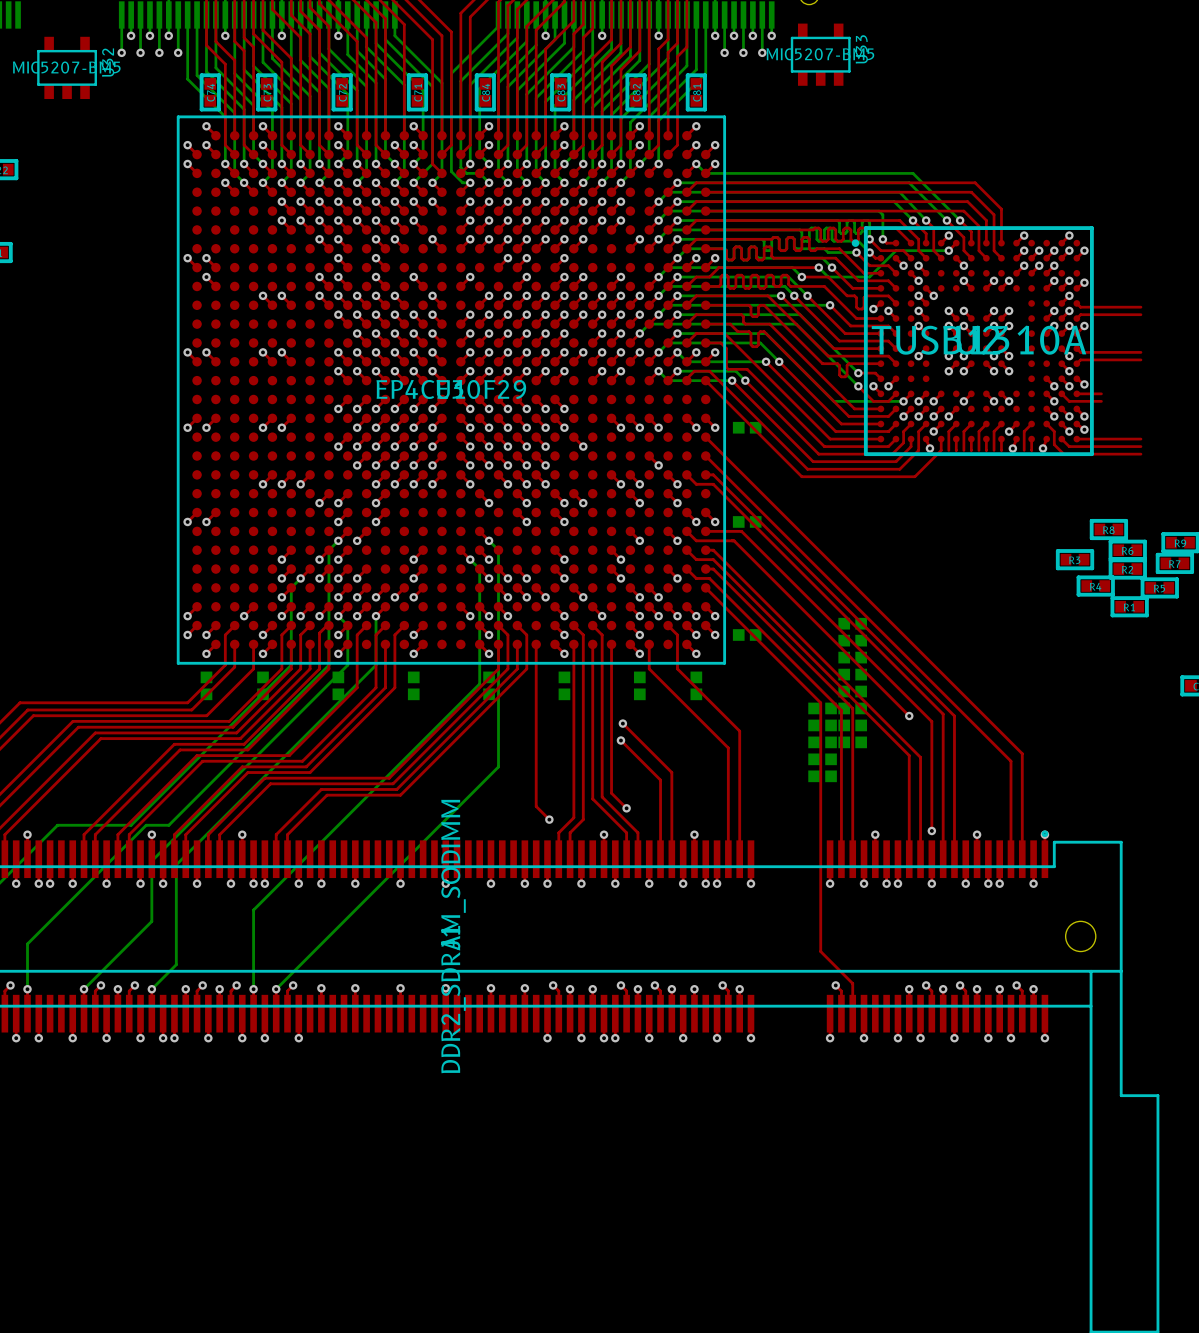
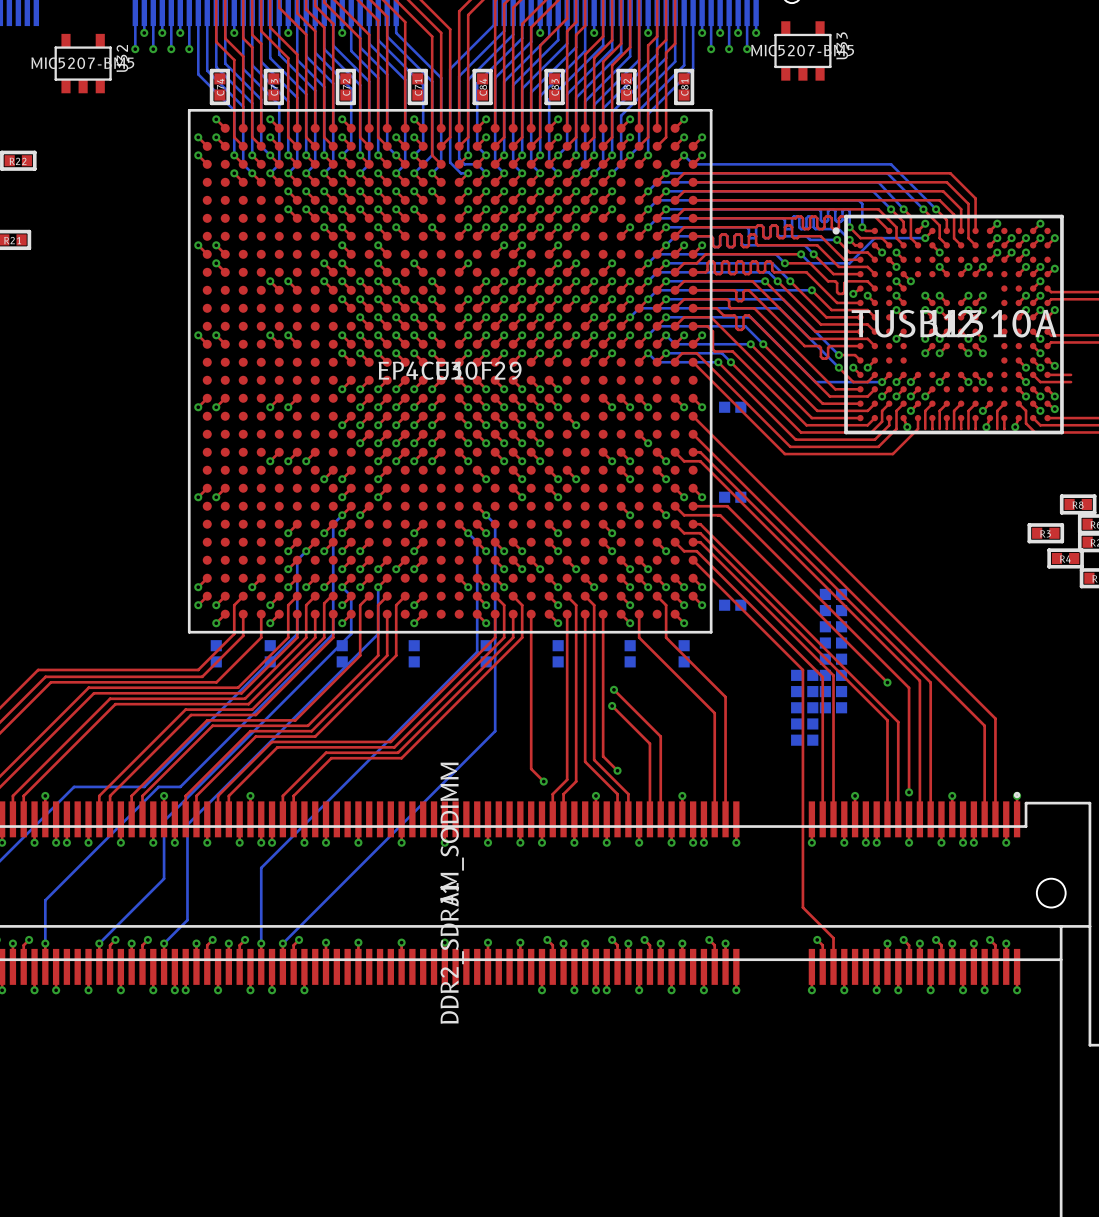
via: none -> (648, 317)

